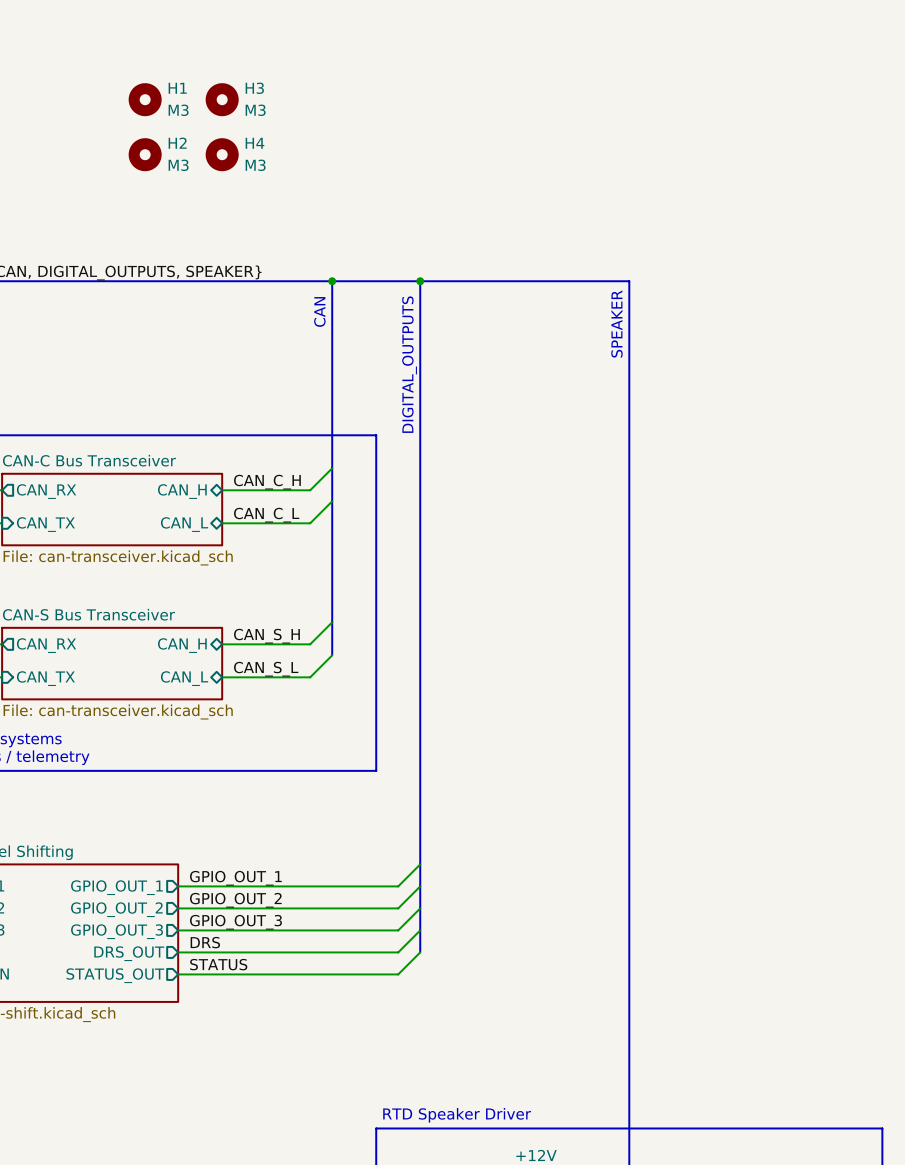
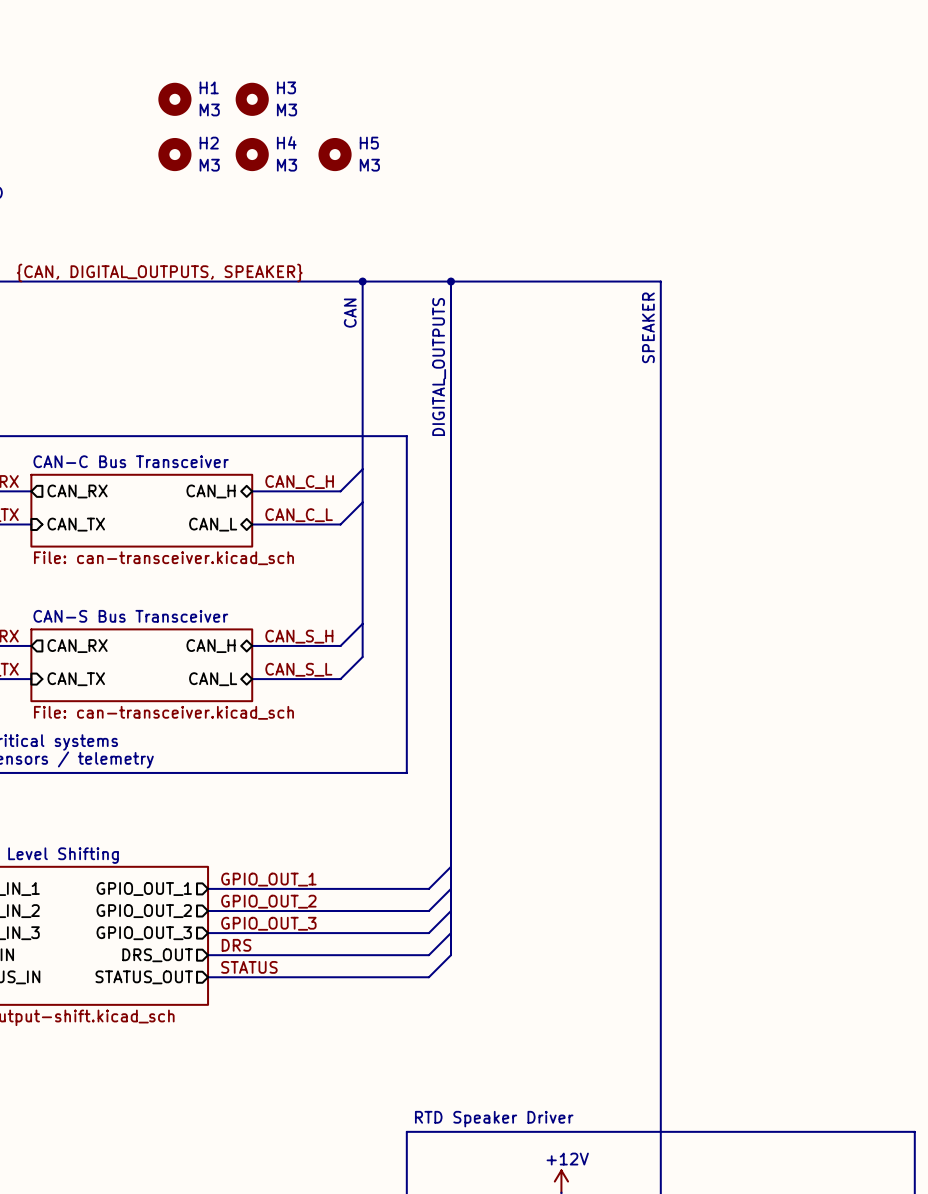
H5: none -> M3 (335, 154)

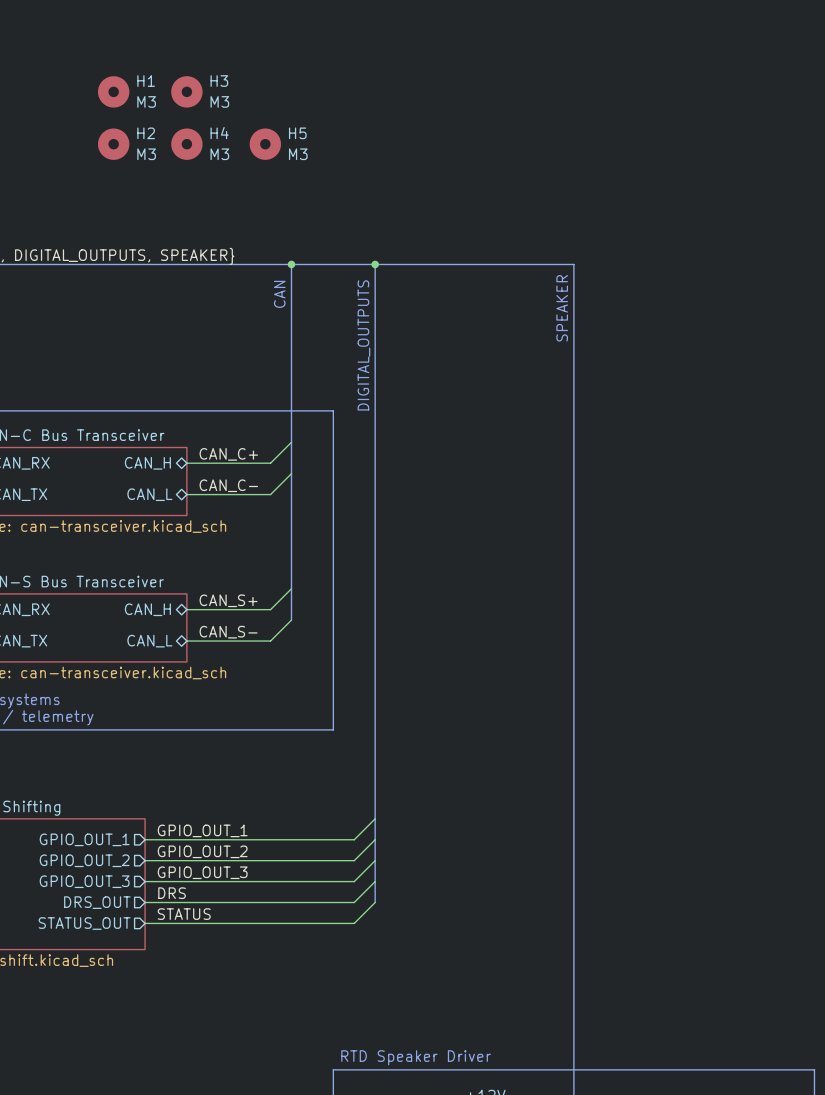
label: CAN_C_H (299, 482) -> CAN_C+ (228, 454)
label: CAN_C_L (299, 515) -> CAN_C- (228, 485)
label: CAN_S_H (299, 636) -> CAN_S+ (228, 600)
label: CAN_S_L (298, 669) -> CAN_S- (228, 632)

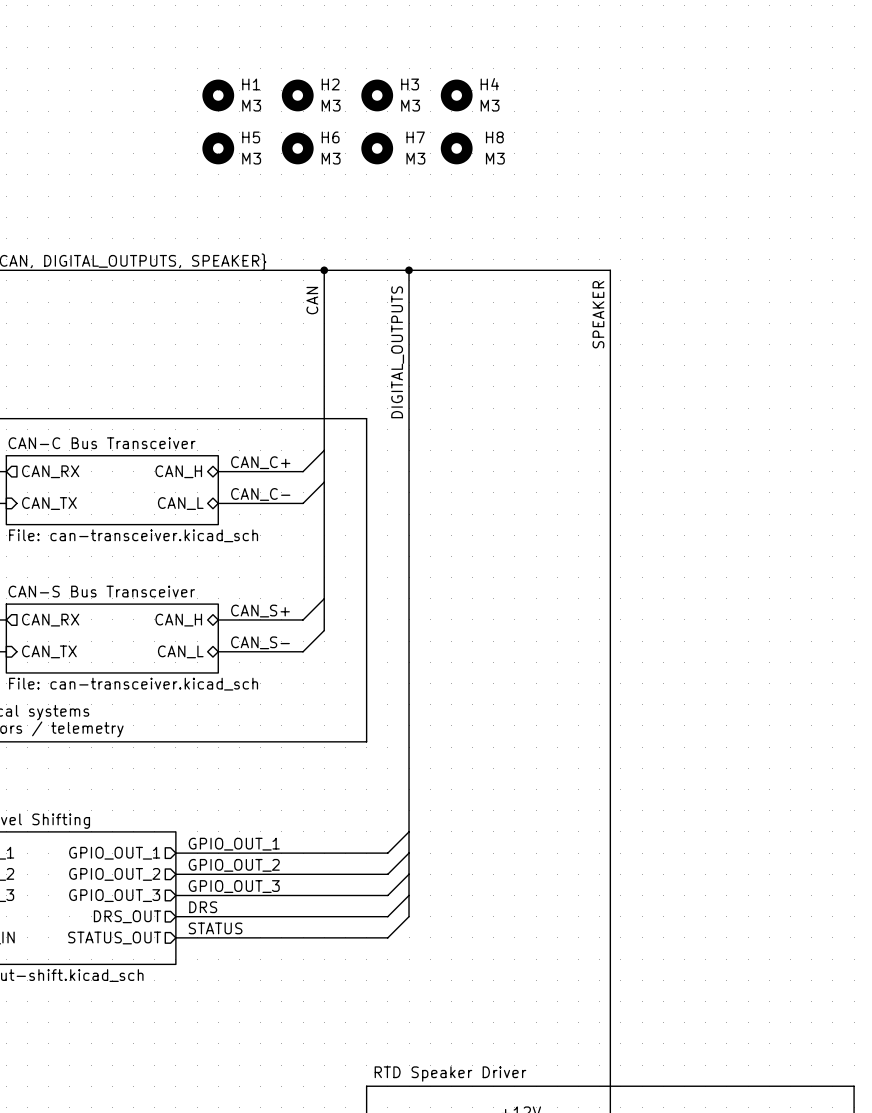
H3 name: H3 (219, 81) -> H1 (251, 84)
H1: M3 (113, 91) -> none
H3: none -> M3 (377, 95)
H4: none -> M3 (456, 95)
H4 name: H4 (219, 133) -> H5 (251, 137)
H5 name: H5 (297, 133) -> H6 (330, 137)
H2 position: (113, 144) -> (297, 95)
H7: none -> M3 (377, 148)
H8: none -> M3 (456, 148)

